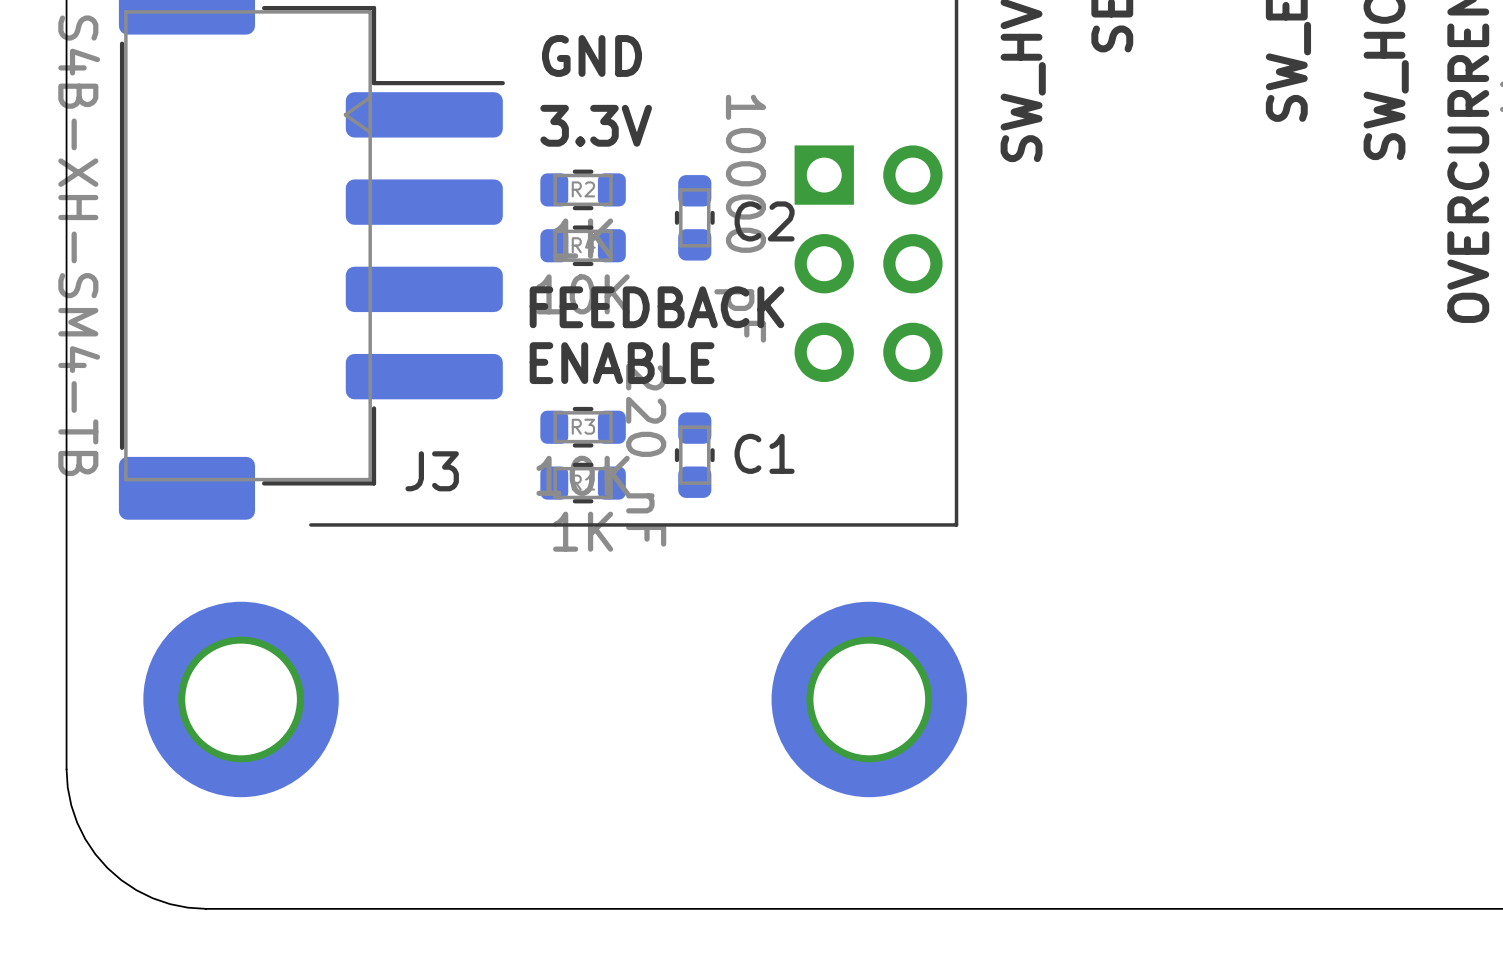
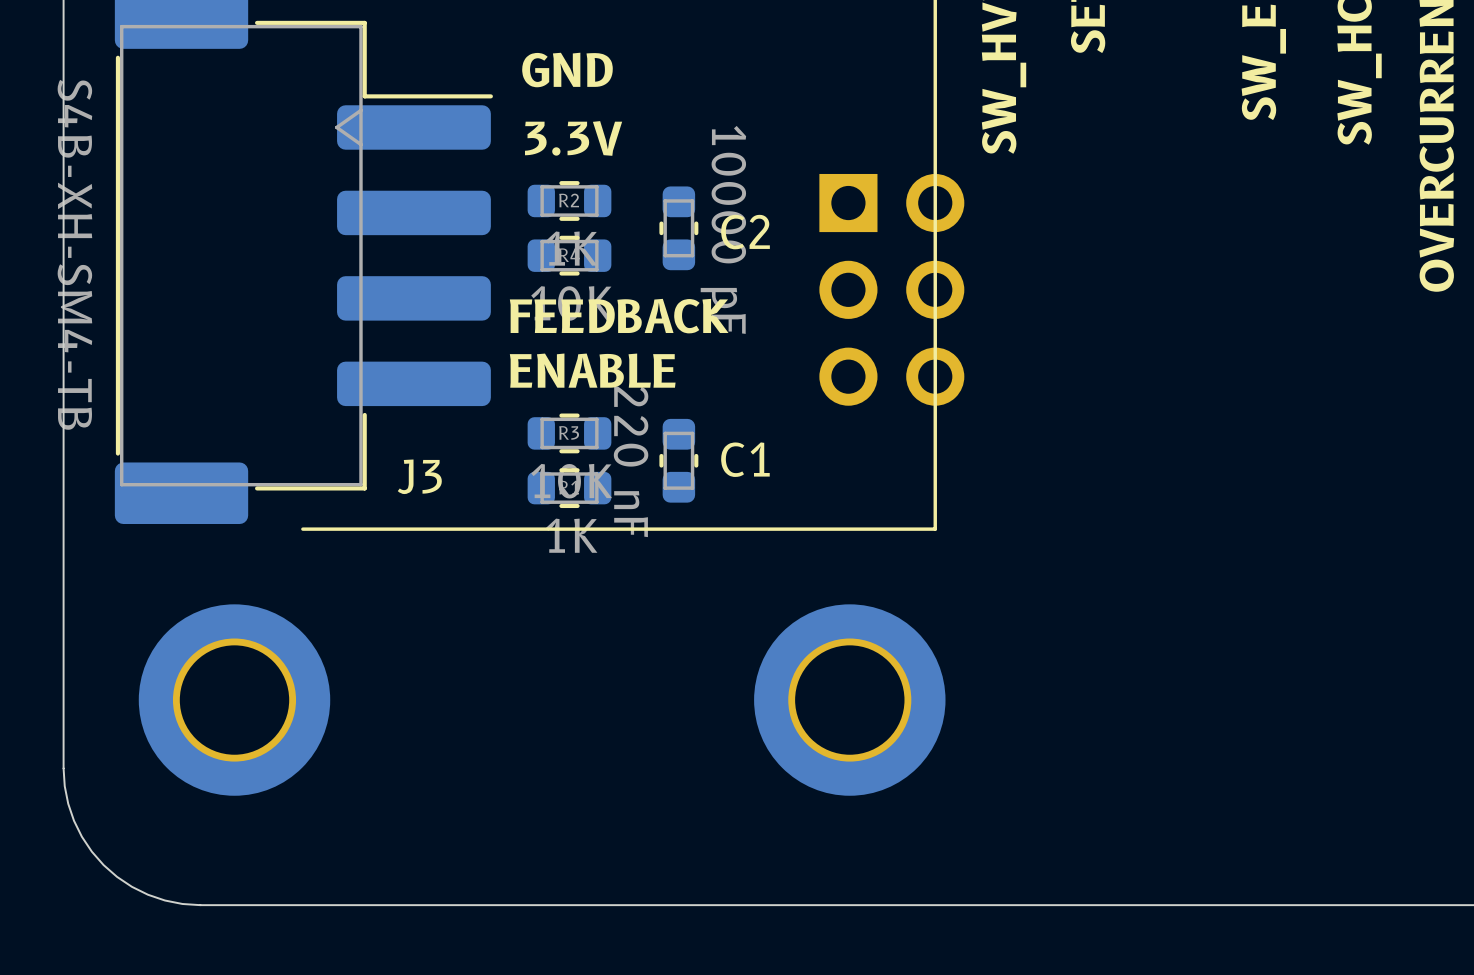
part position: (868, 263) -> (891, 289)

